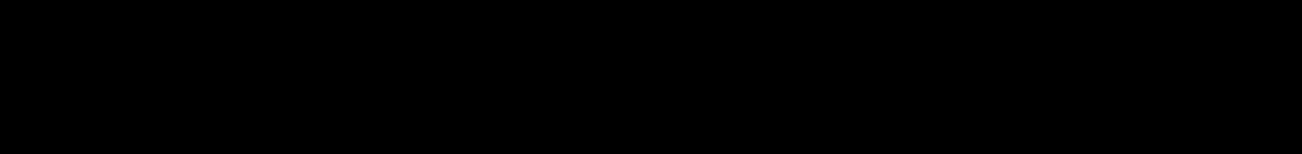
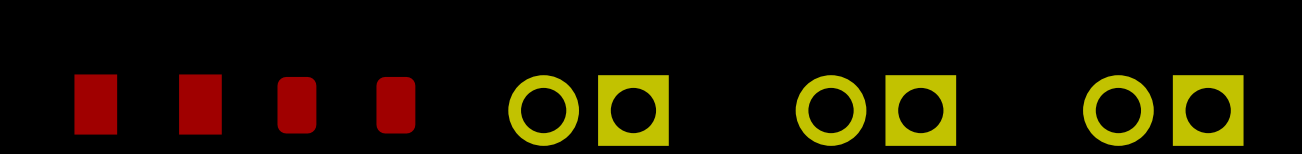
part: none -> (148, 104)
part: none -> (346, 105)
part: none -> (588, 110)
part: none -> (875, 110)
part: none -> (1163, 110)

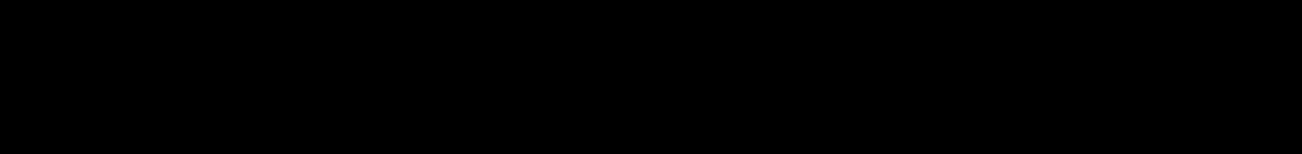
part: (148, 104) -> none
part: (346, 105) -> none
part: (588, 110) -> none
part: (875, 110) -> none
part: (1163, 110) -> none

